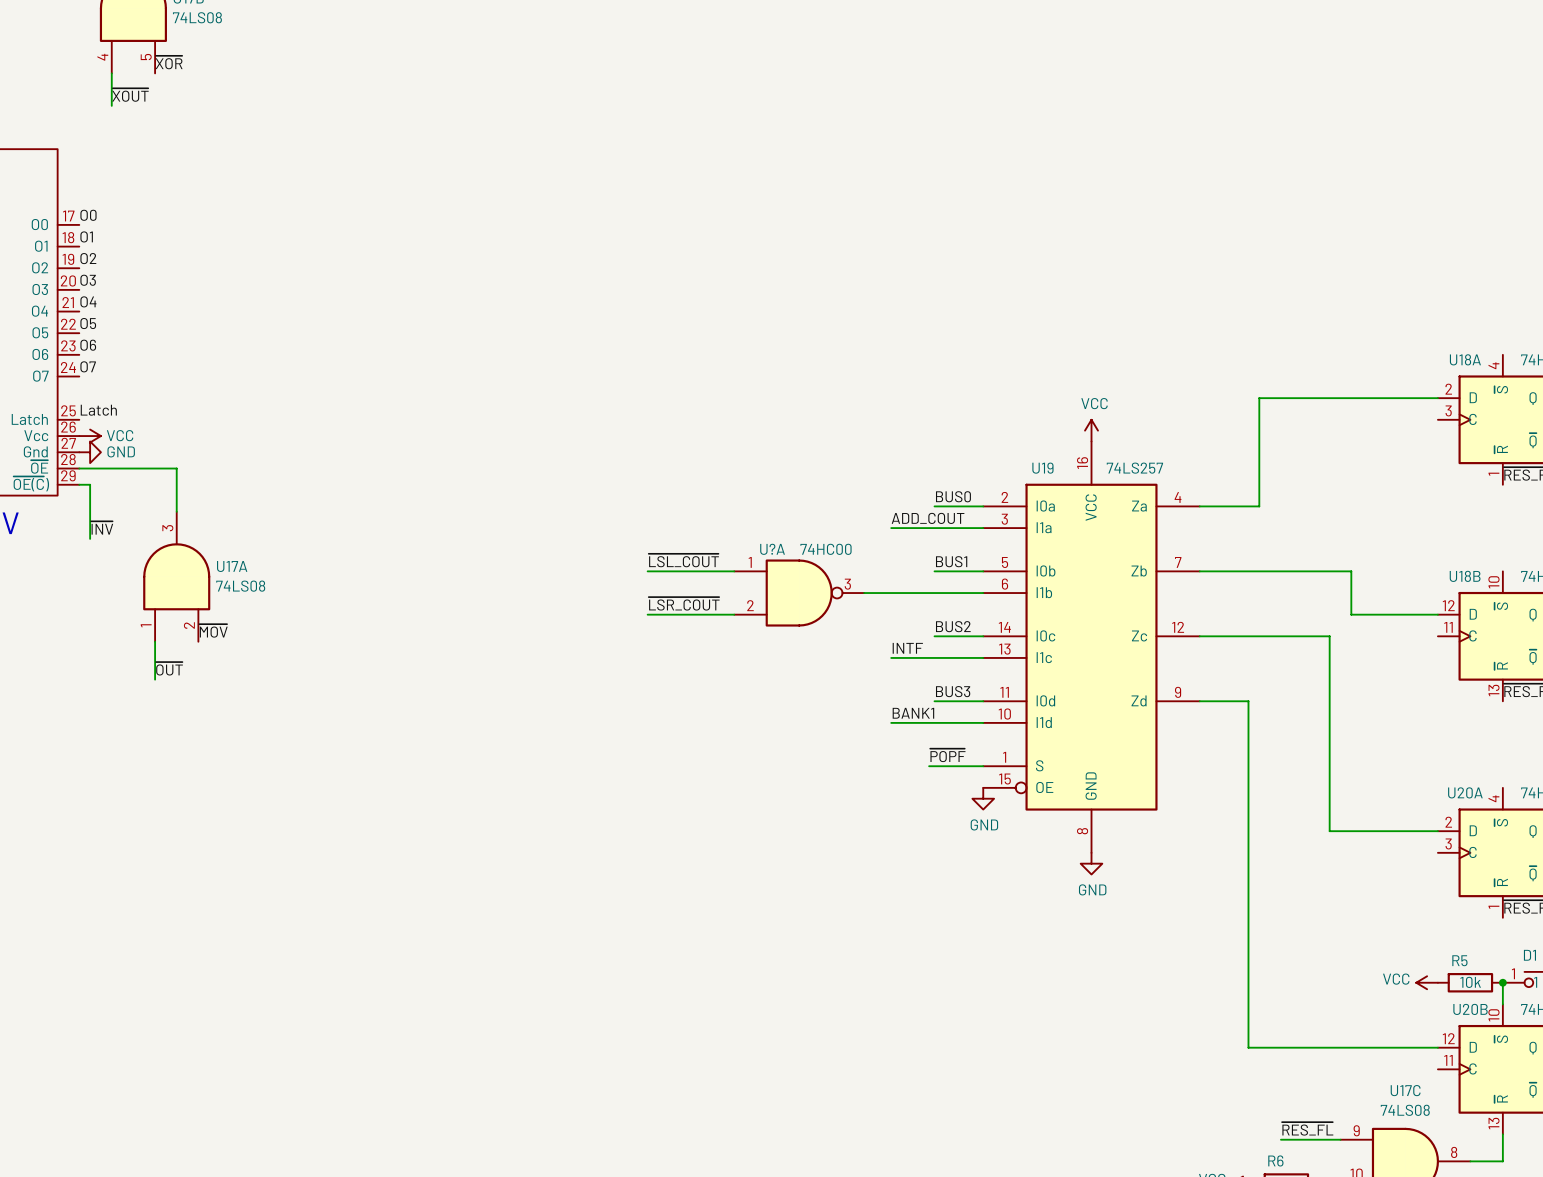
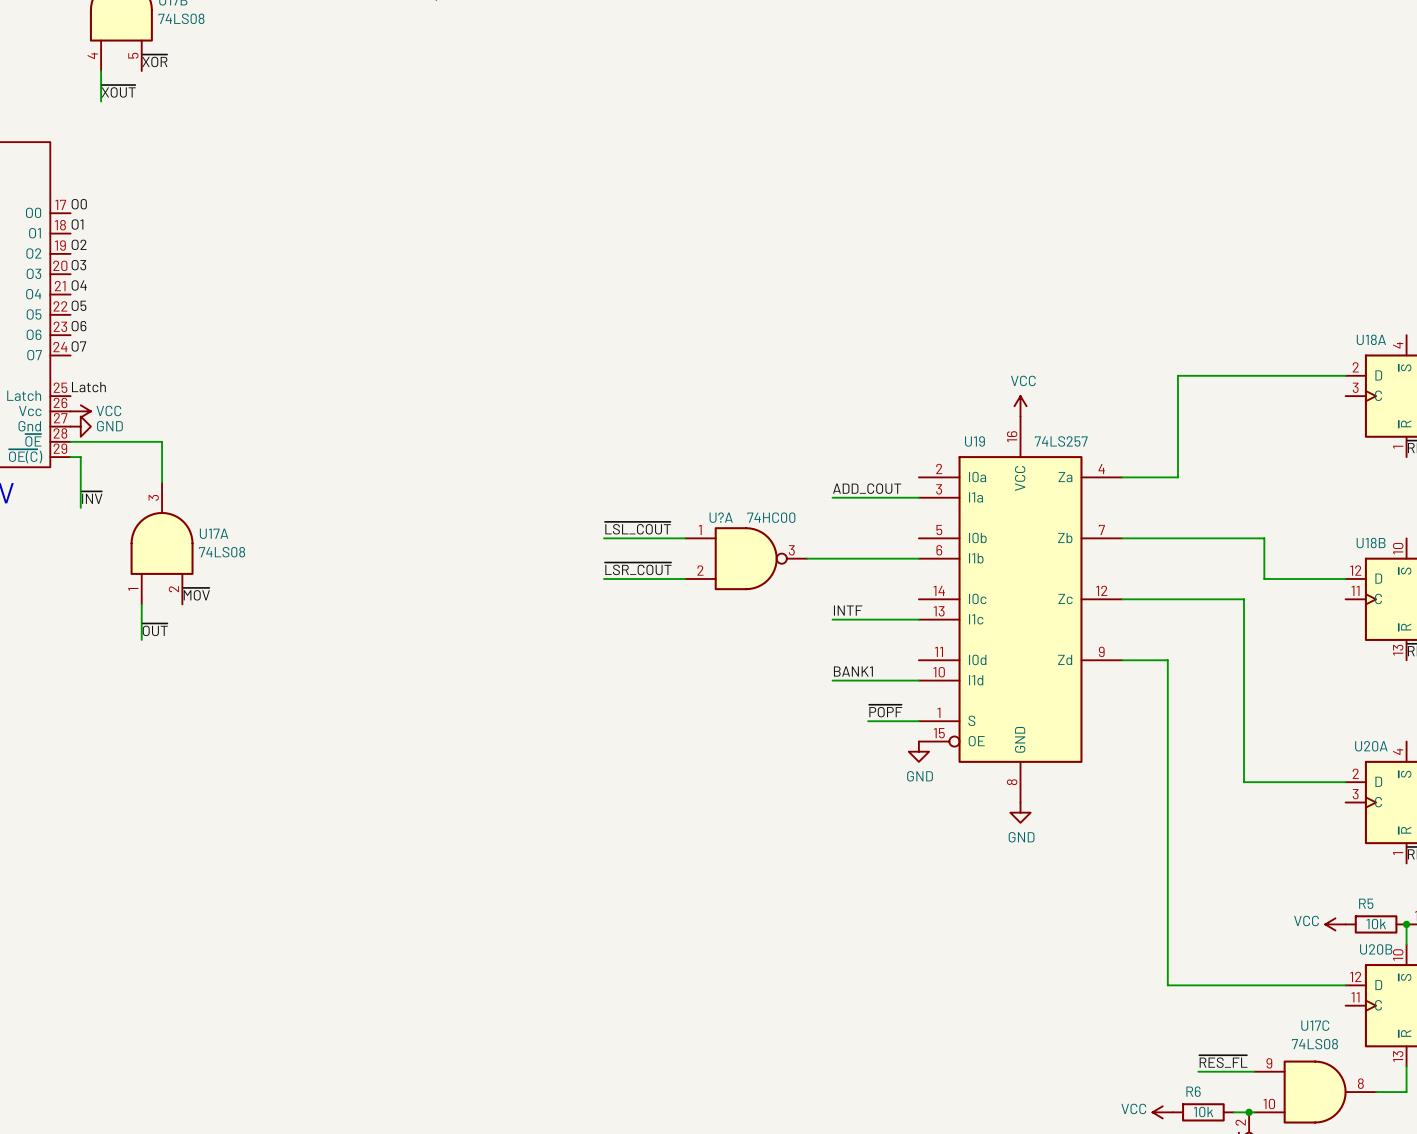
label: BUS0 (953, 496) -> none
wire: (934, 506) (983, 506) -> none
label: BUS1 (951, 561) -> none
wire: (934, 571) (983, 571) -> none
label: BUS2 (953, 626) -> none
wire: (934, 636) (983, 636) -> none
label: BUS3 (953, 691) -> none
wire: (934, 701) (983, 701) -> none

